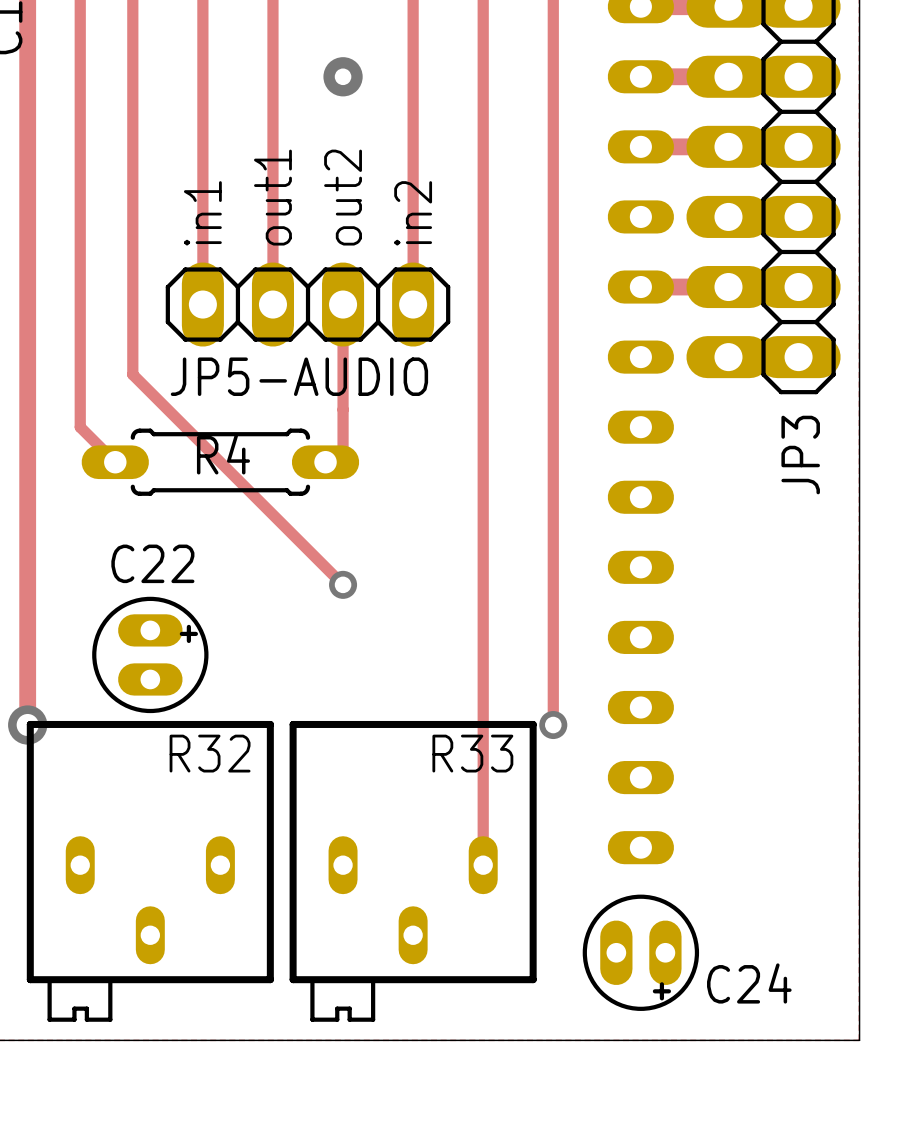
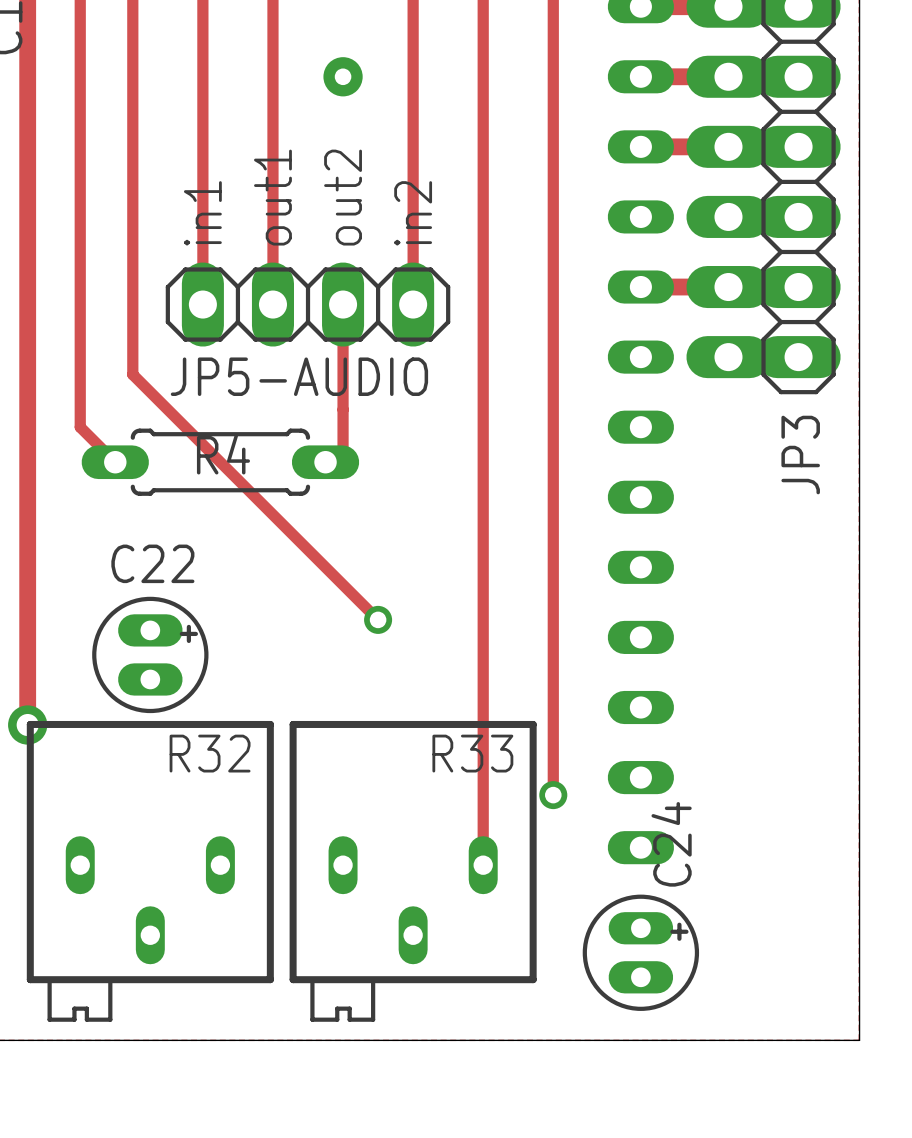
track: none -> (343, 584) (378, 619)
via position: (343, 584) -> (378, 619)
track: none -> (553, 725) (553, 795)
via position: (553, 725) -> (553, 795)
C24 rotation: 0° (640, 952) -> 90° counterclockwise (640, 952)

